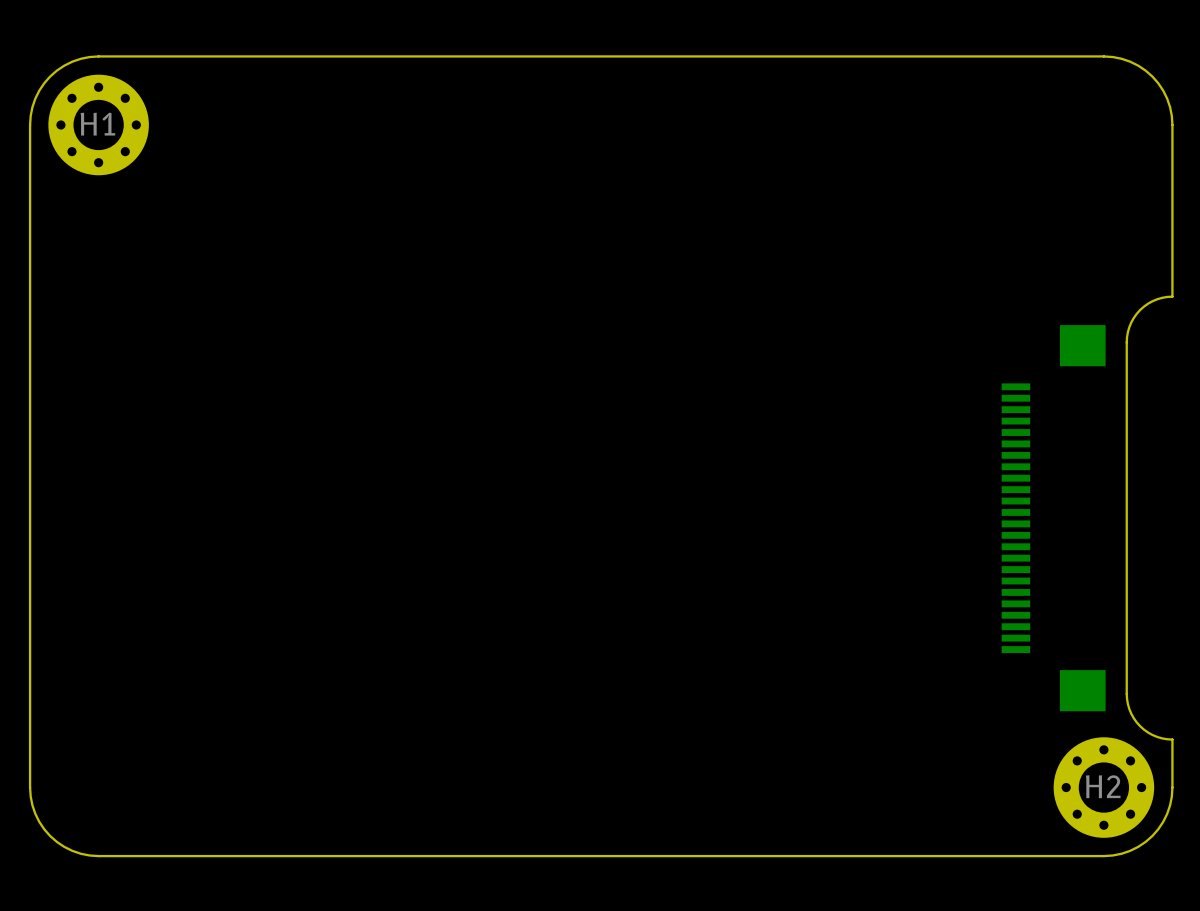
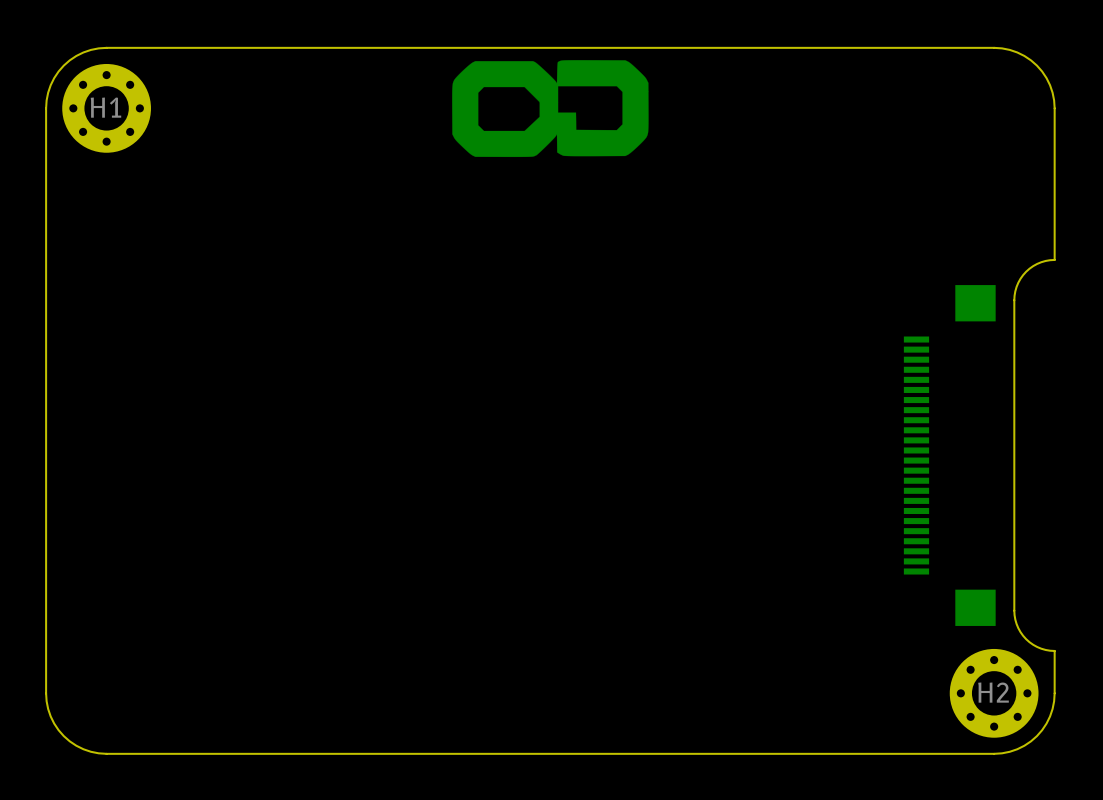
drawing: none -> [452, 60, 649, 158]

